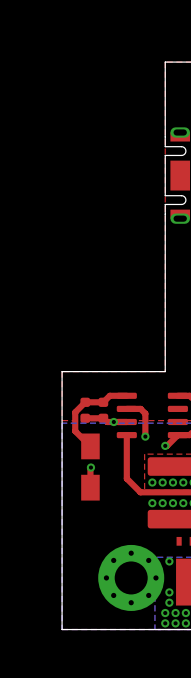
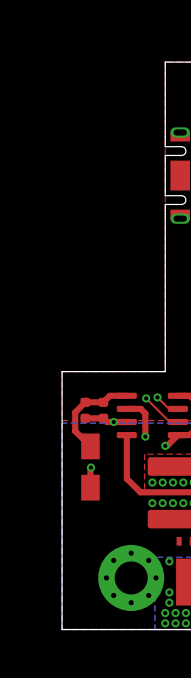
top track: none -> (157, 397) (169, 408) (177, 408)
via: none -> (157, 397)
top track: none -> (146, 398) (169, 422) (177, 422)
via: none -> (146, 398)

